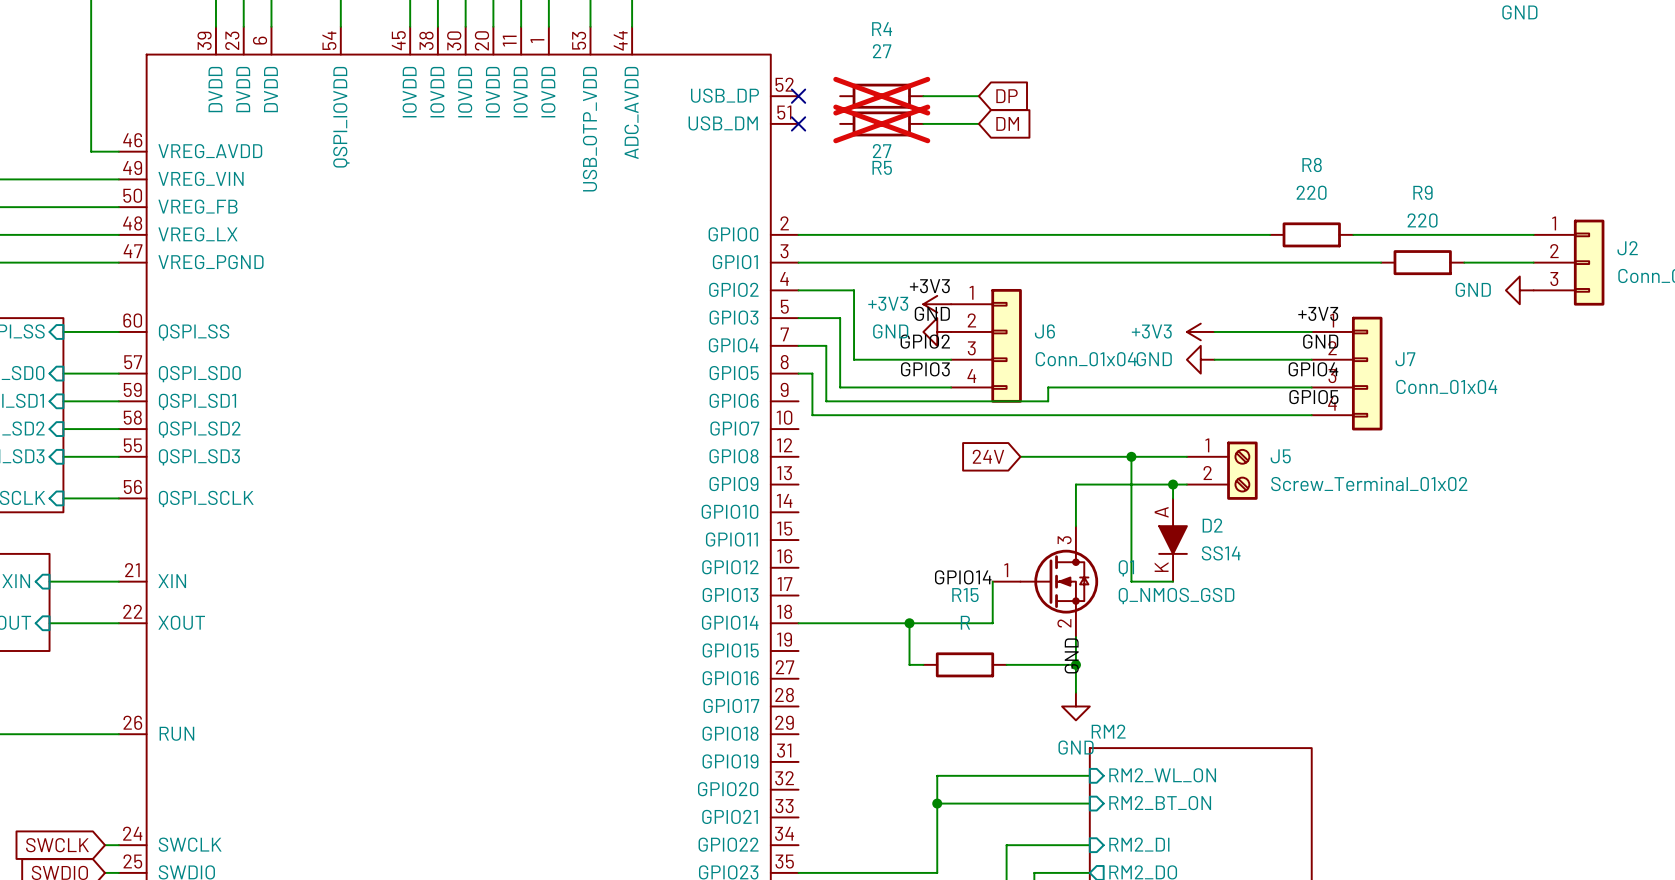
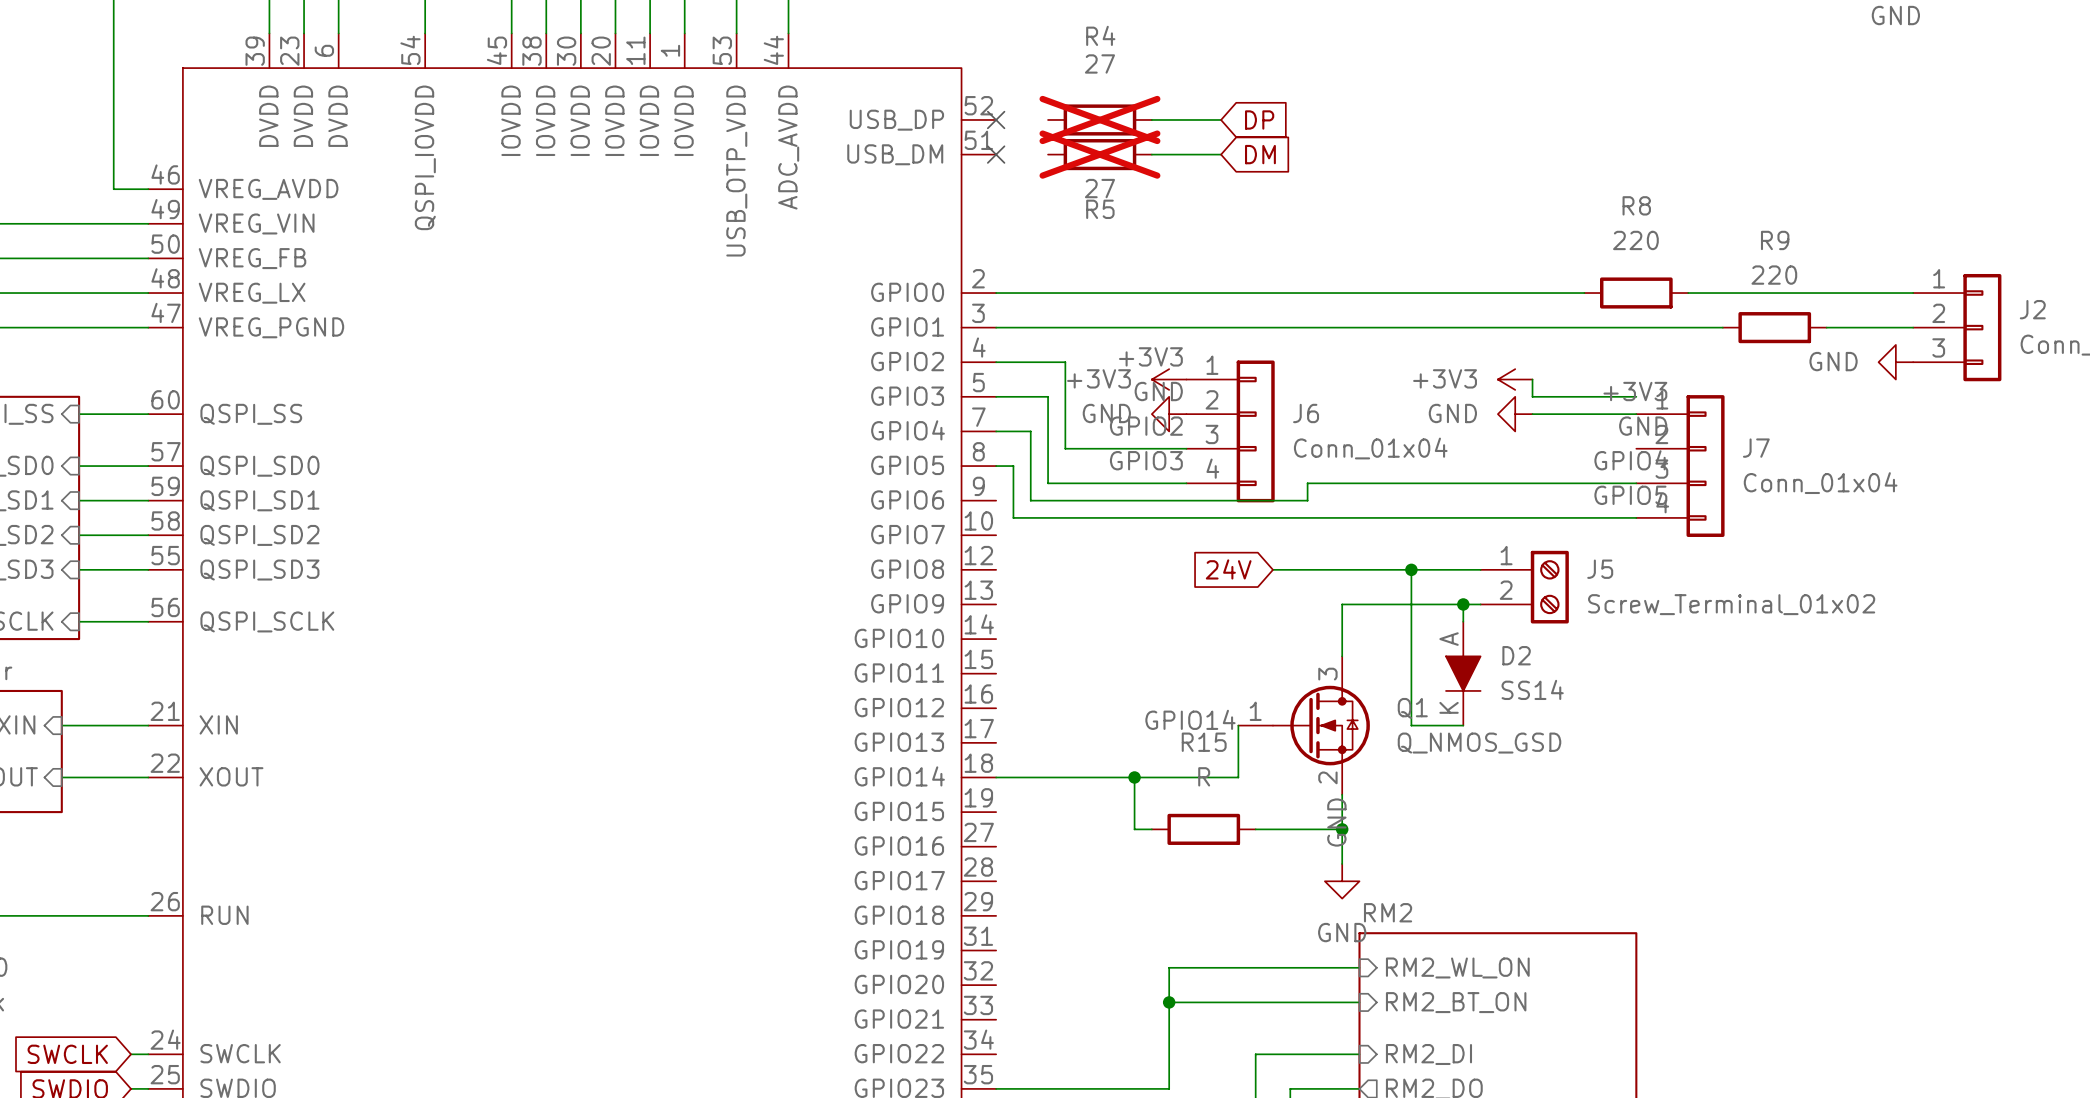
wire: none -> (1532, 379) (1532, 396) (1636, 396)
power symbol position: +3V3 (1200, 331) -> +3V3 (1515, 379)
power symbol position: GND (1200, 359) -> GND (1515, 414)
wire: (1214, 359) (1311, 359) -> none

